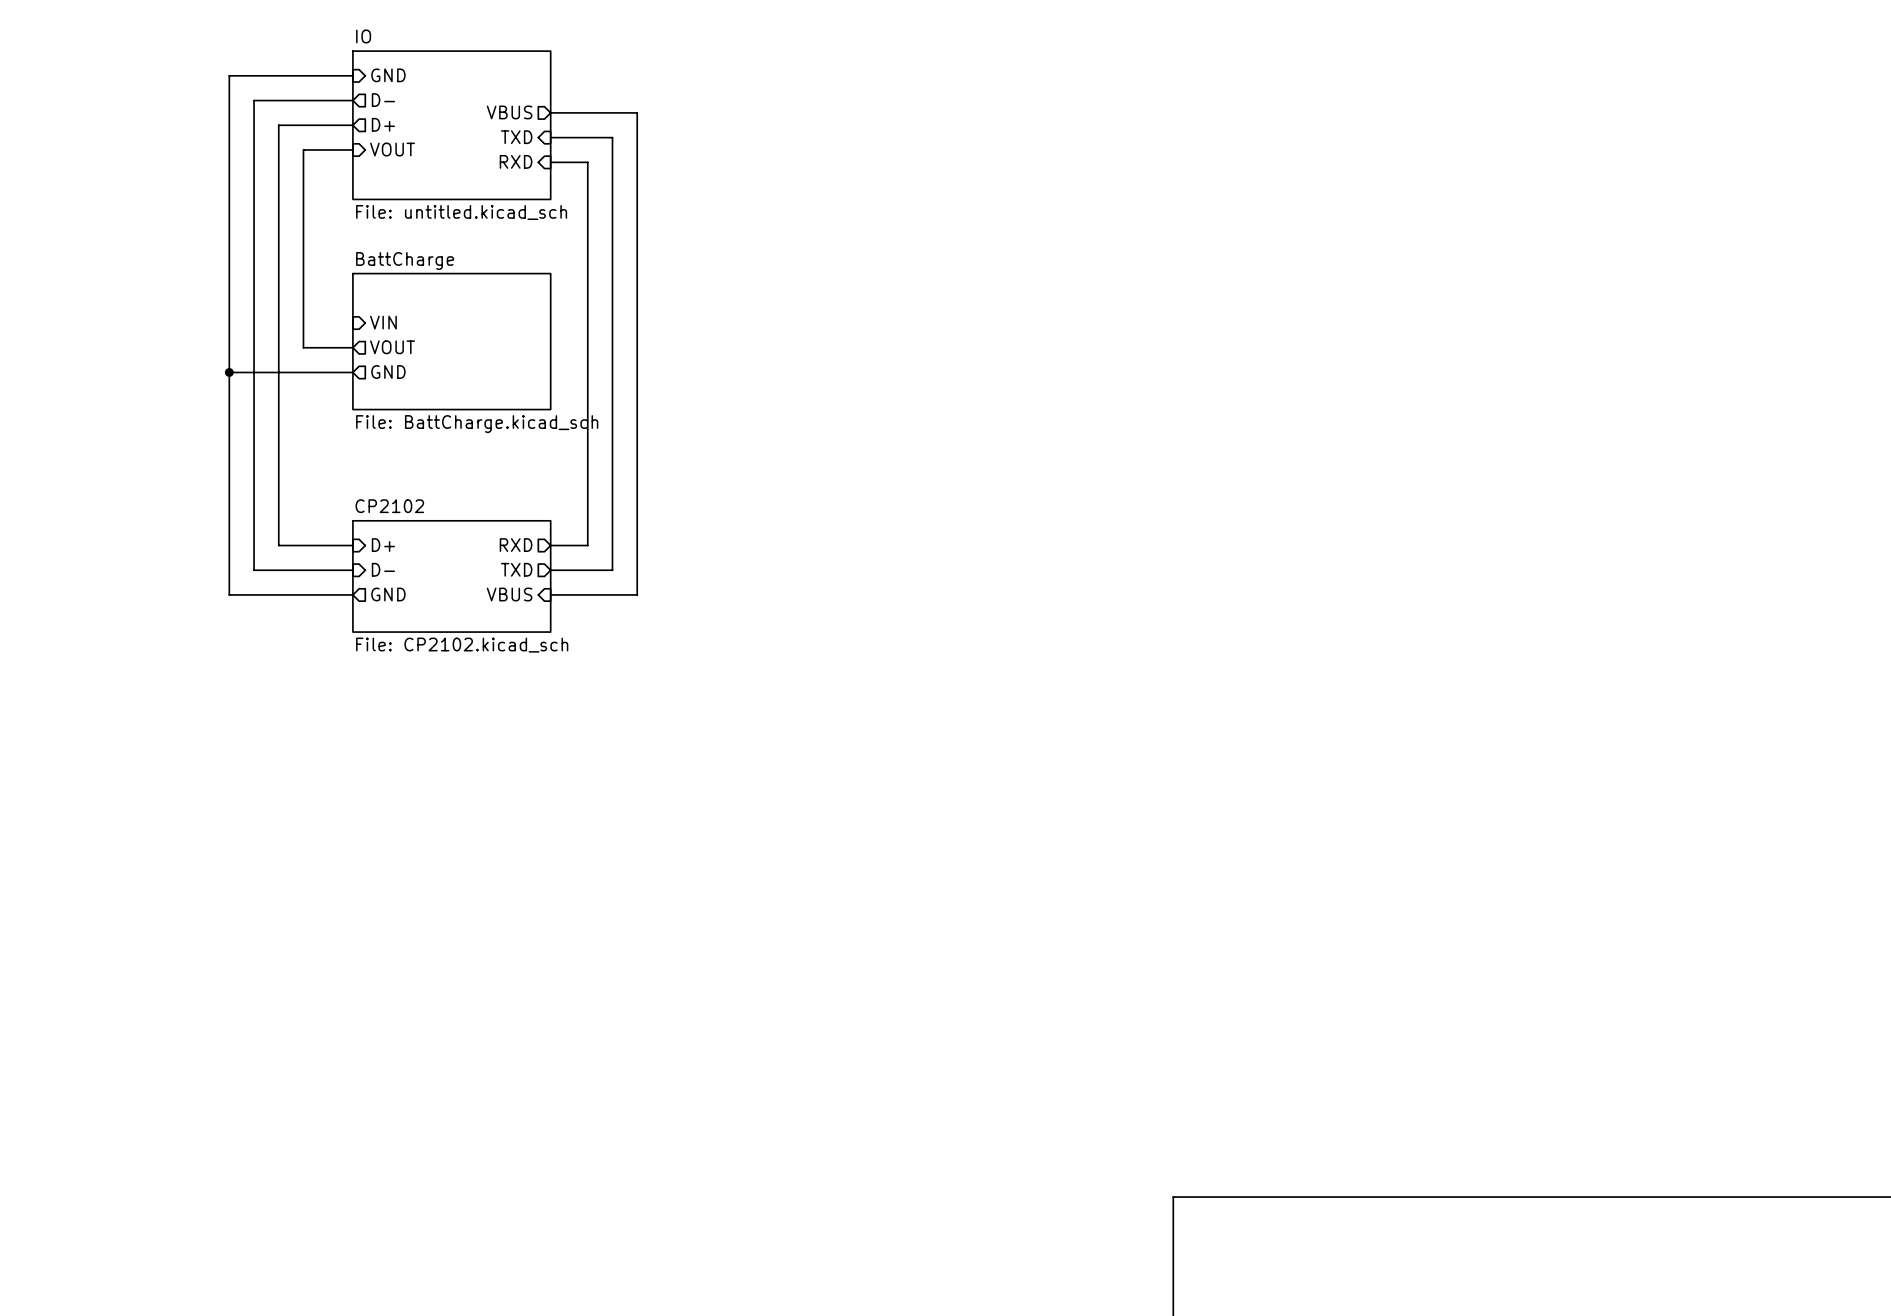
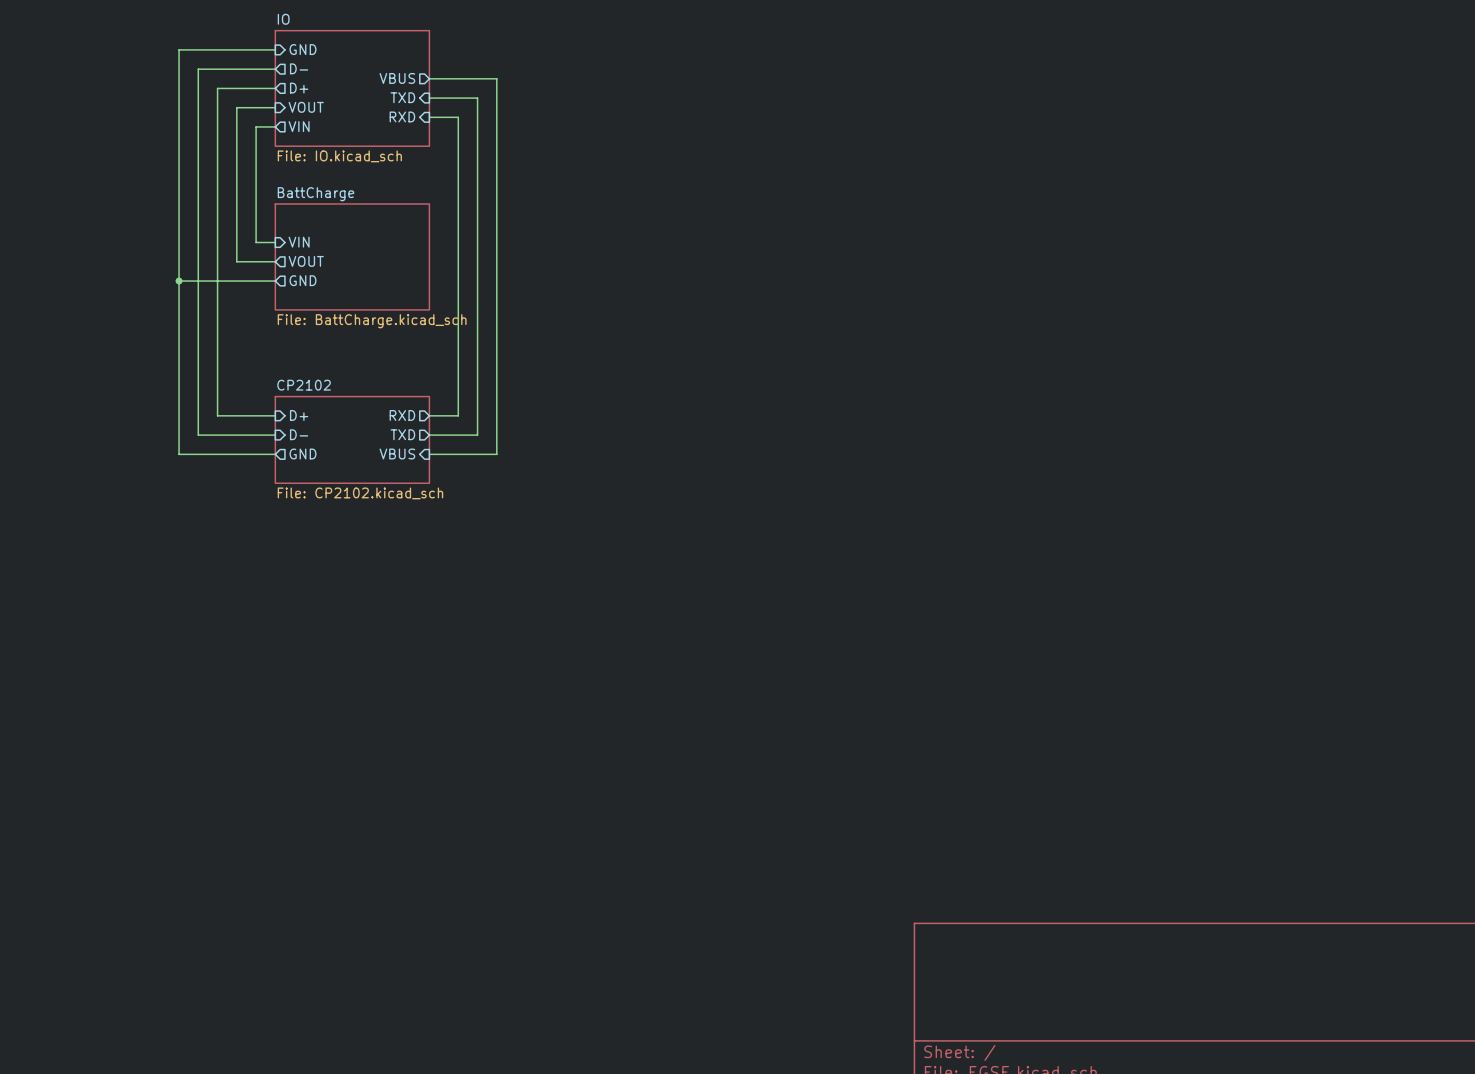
wire: none -> (275, 126) (256, 126) (256, 242) (275, 242)
sheet pin: none -> VIN (299, 126)
sheet IO value: File: untitled.kicad_sch (461, 212) -> File: IO.kicad_sch (339, 156)

